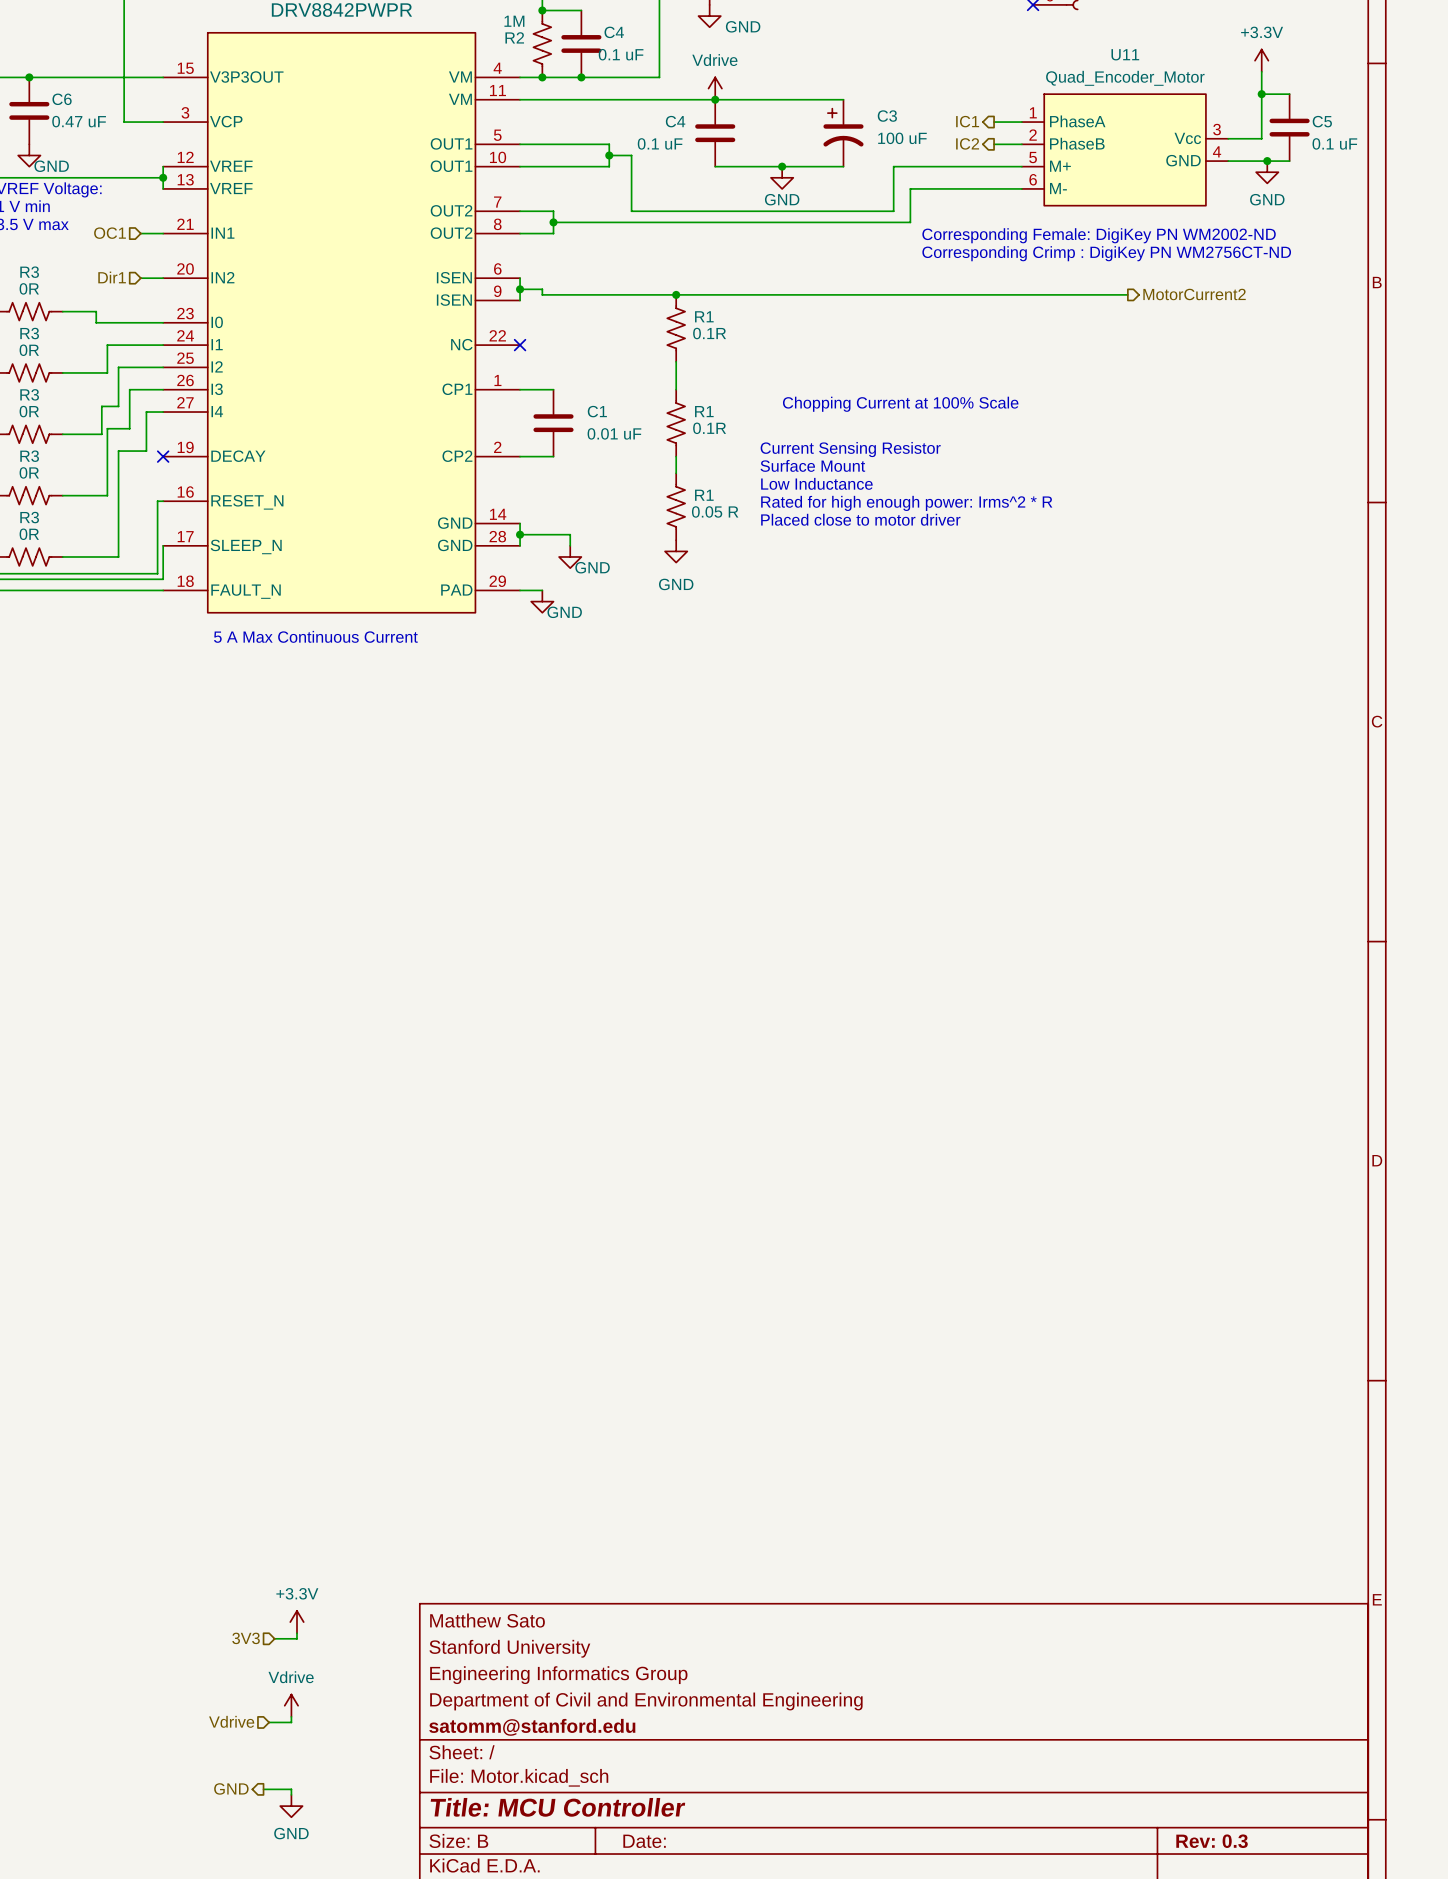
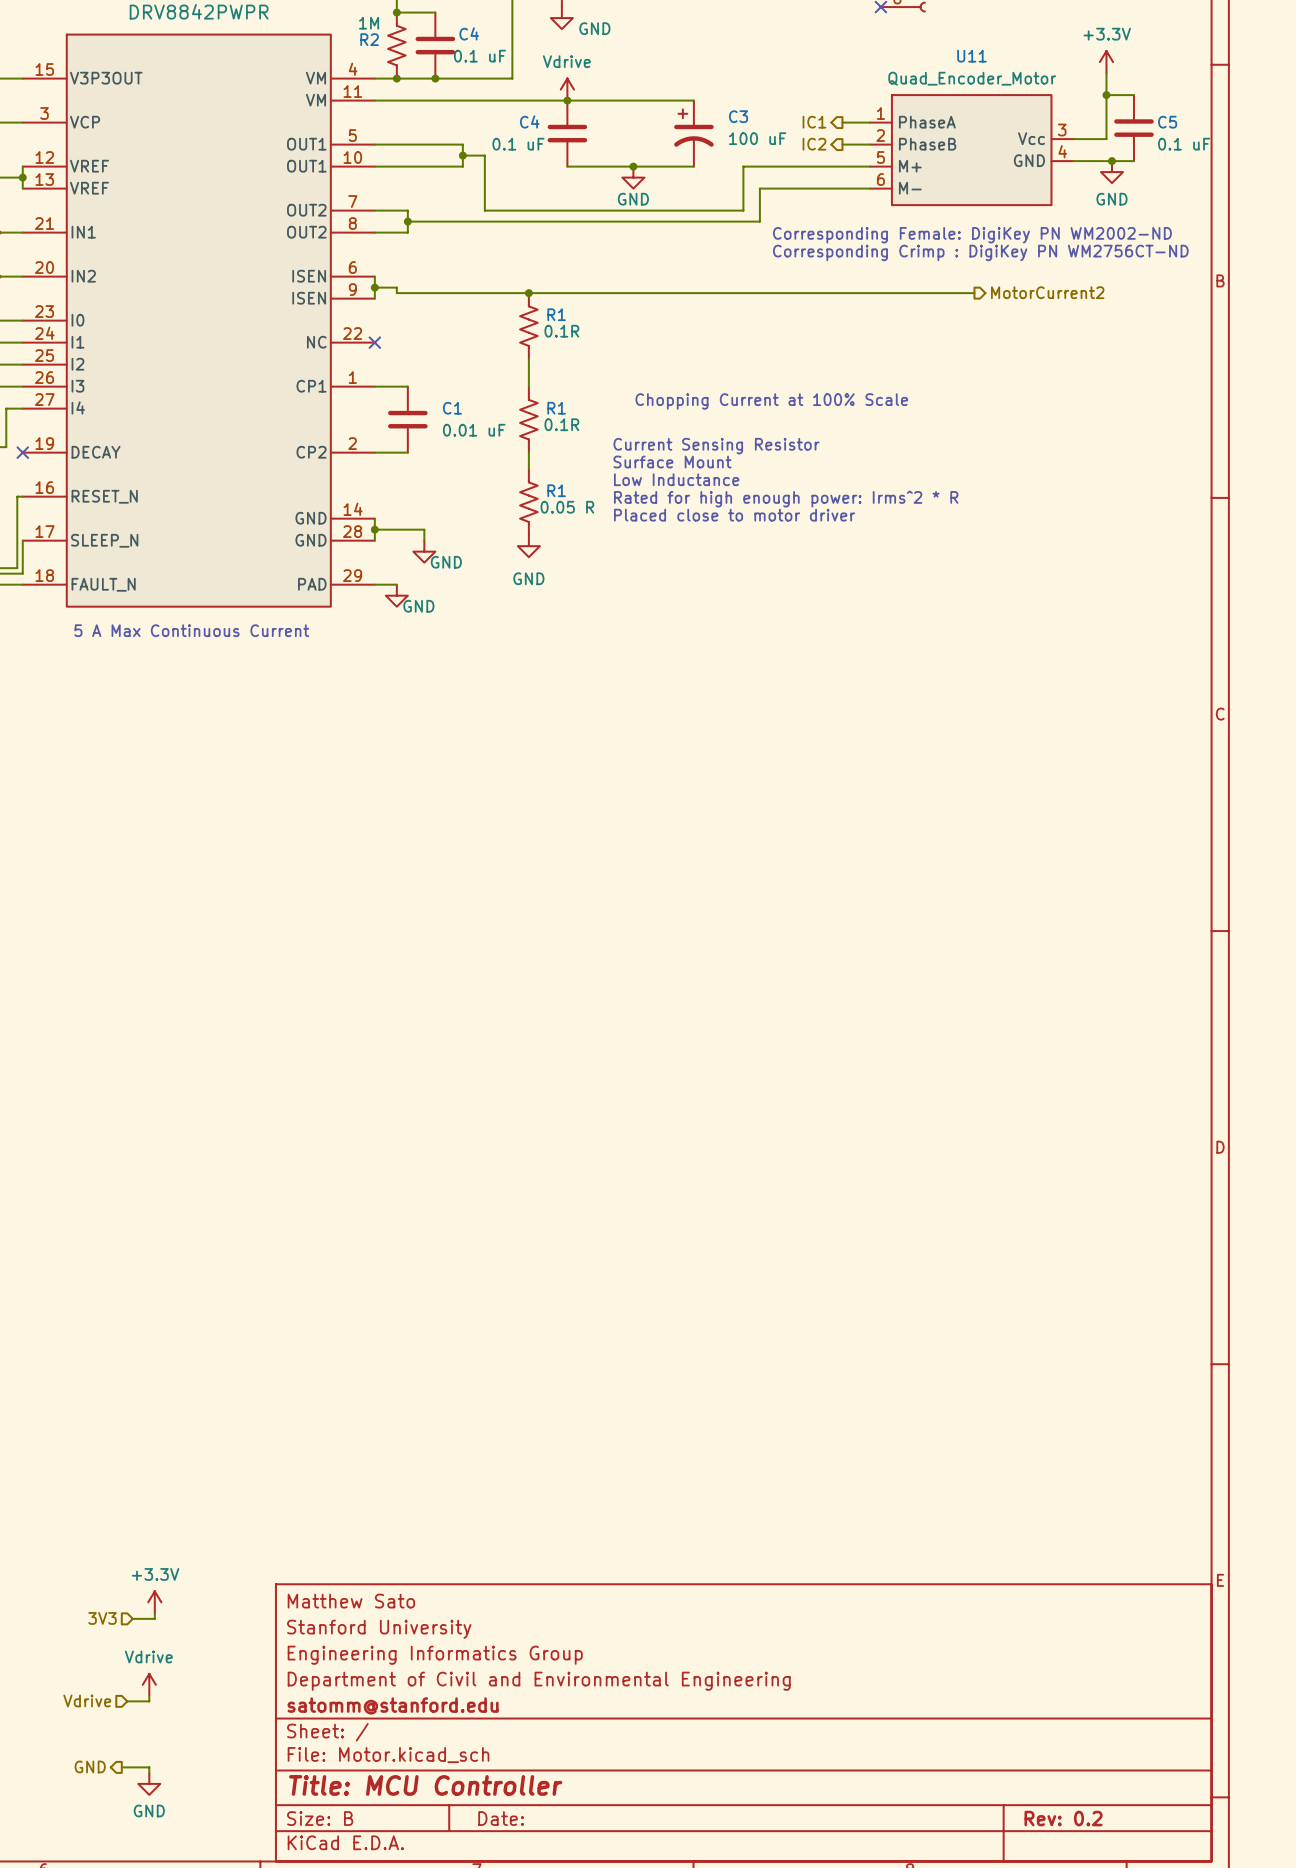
title block: Rev: 0.3 (1212, 1841) -> Rev: 0.2 (1063, 1818)

